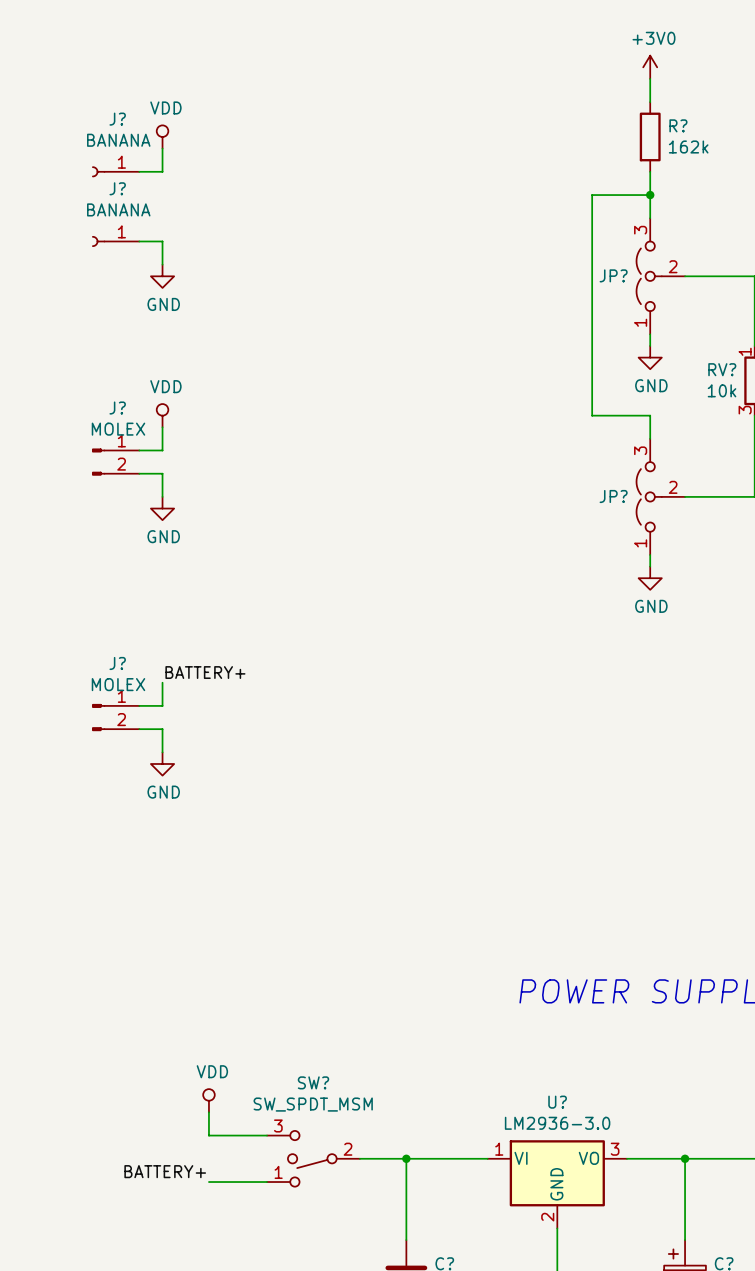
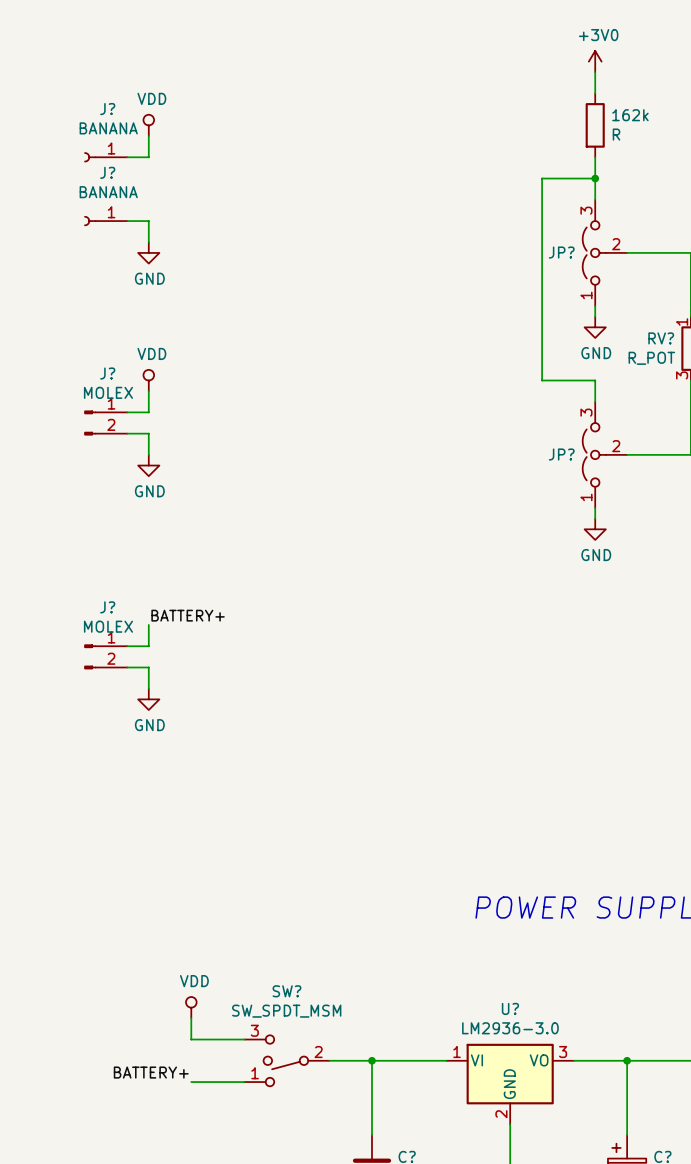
R? name: R? (678, 125) -> 162k (630, 115)
R? value: 162k (688, 146) -> R (616, 134)
RV? value: 10k (722, 390) -> R_POT (651, 358)

